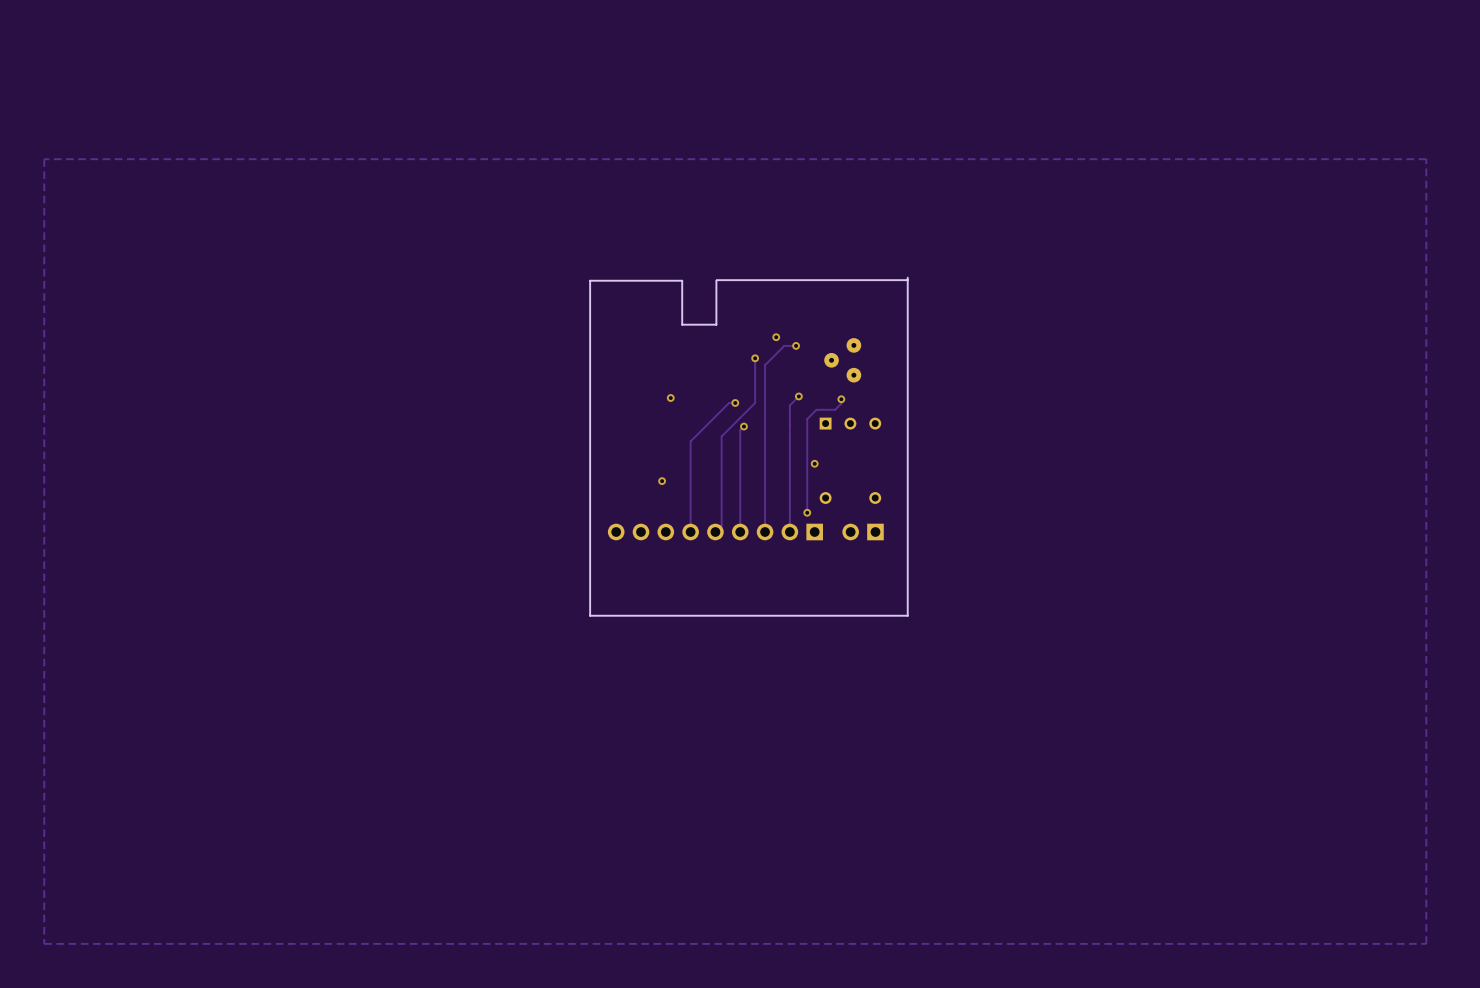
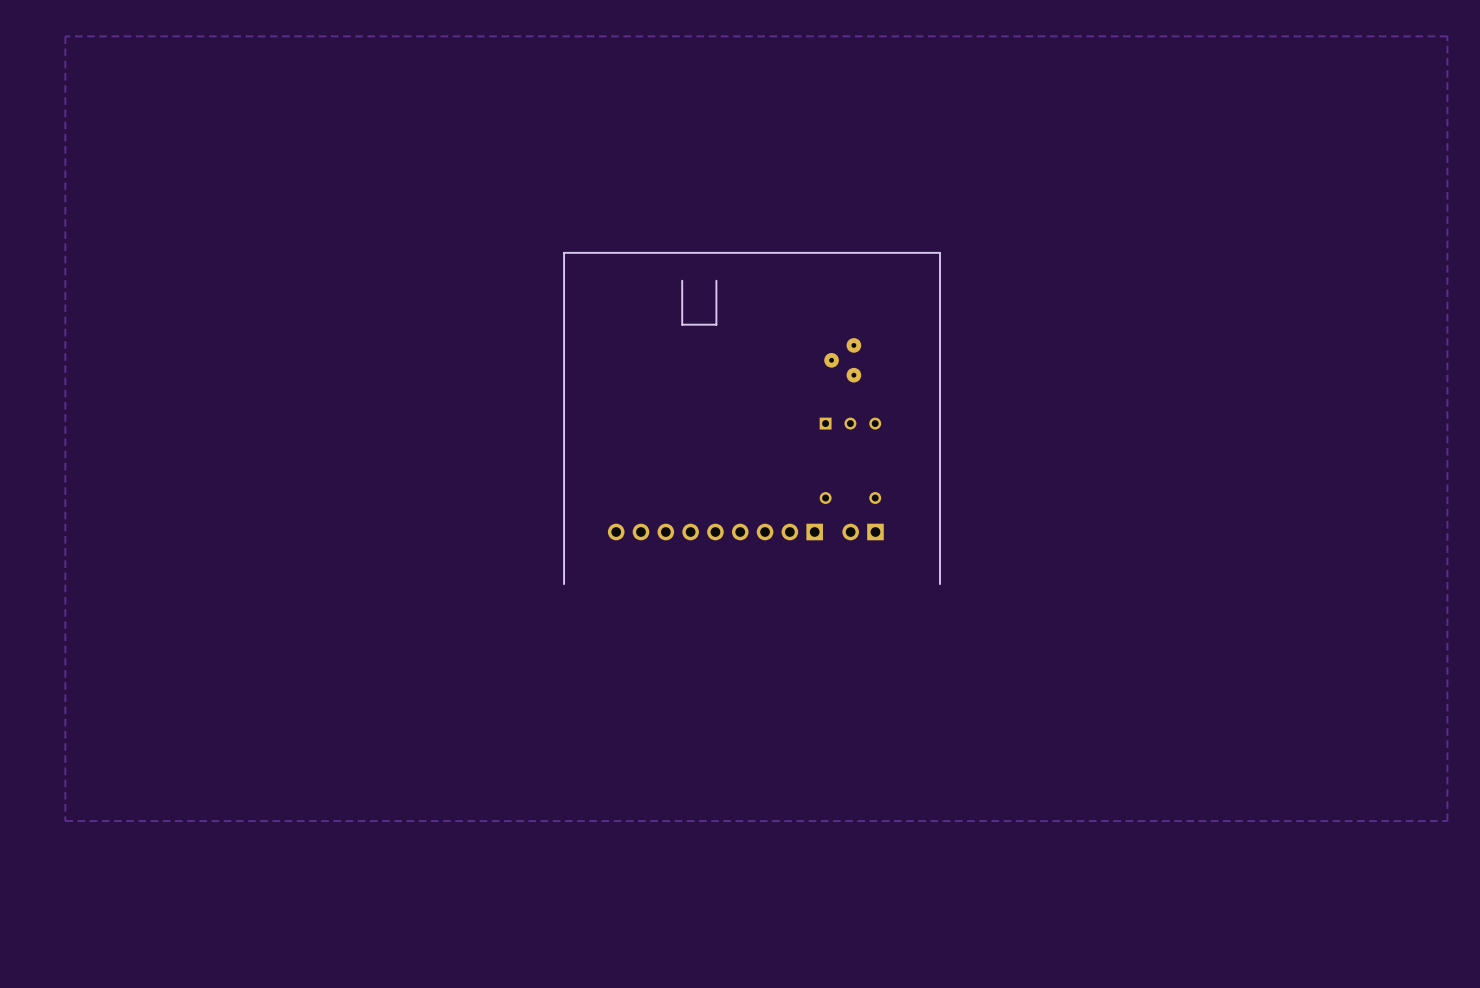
zone outline: (1426, 159) (1426, 943) (44, 943) (44, 159) (1426, 159) -> (1447, 36) (1447, 821) (65, 821) (65, 36) (1447, 36)
board edge: (907, 277) (907, 615) (590, 615) (590, 280) (682, 280) -> none
board edge: (907, 280) (716, 280) -> none
via: (776, 337) -> none
track: (796, 345) (784, 345) (765, 365) (765, 532) -> none
via: (796, 345) -> none
track: (755, 358) (755, 402) (721, 436) (721, 525) (715, 532) -> none
via: (755, 358) -> none
track: (798, 396) (789, 405) (789, 532) -> none
via: (798, 396) -> none
via: (670, 398) -> none
track: (841, 399) (841, 403) (835, 409) (816, 409) (807, 419) (807, 512) -> none
via: (841, 399) -> none
track: (735, 402) (729, 402) (690, 441) (690, 532) -> none
via: (735, 402) -> none
track: (743, 426) (740, 430) (741, 532) -> none
via: (743, 426) -> none
via: (814, 463) -> none
via: (662, 481) -> none
via: (807, 512) -> none
board edge: none -> (939, 584) (939, 252) (564, 252) (564, 584)

